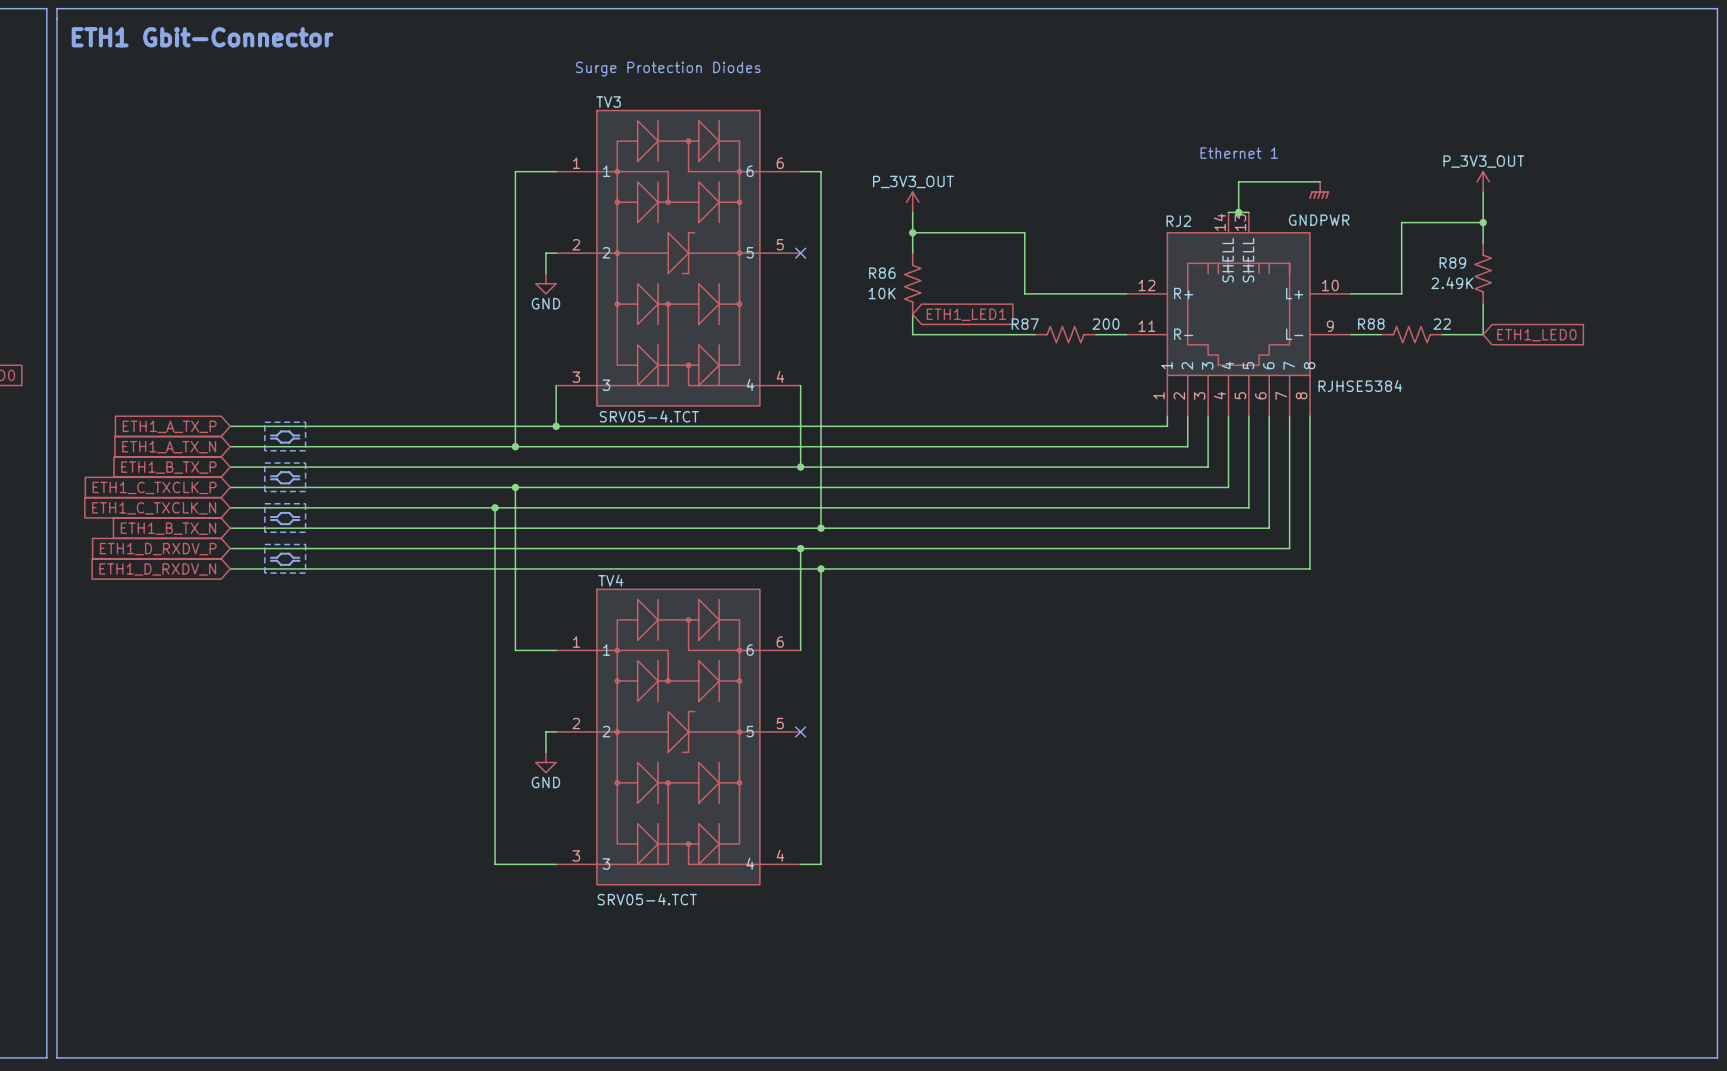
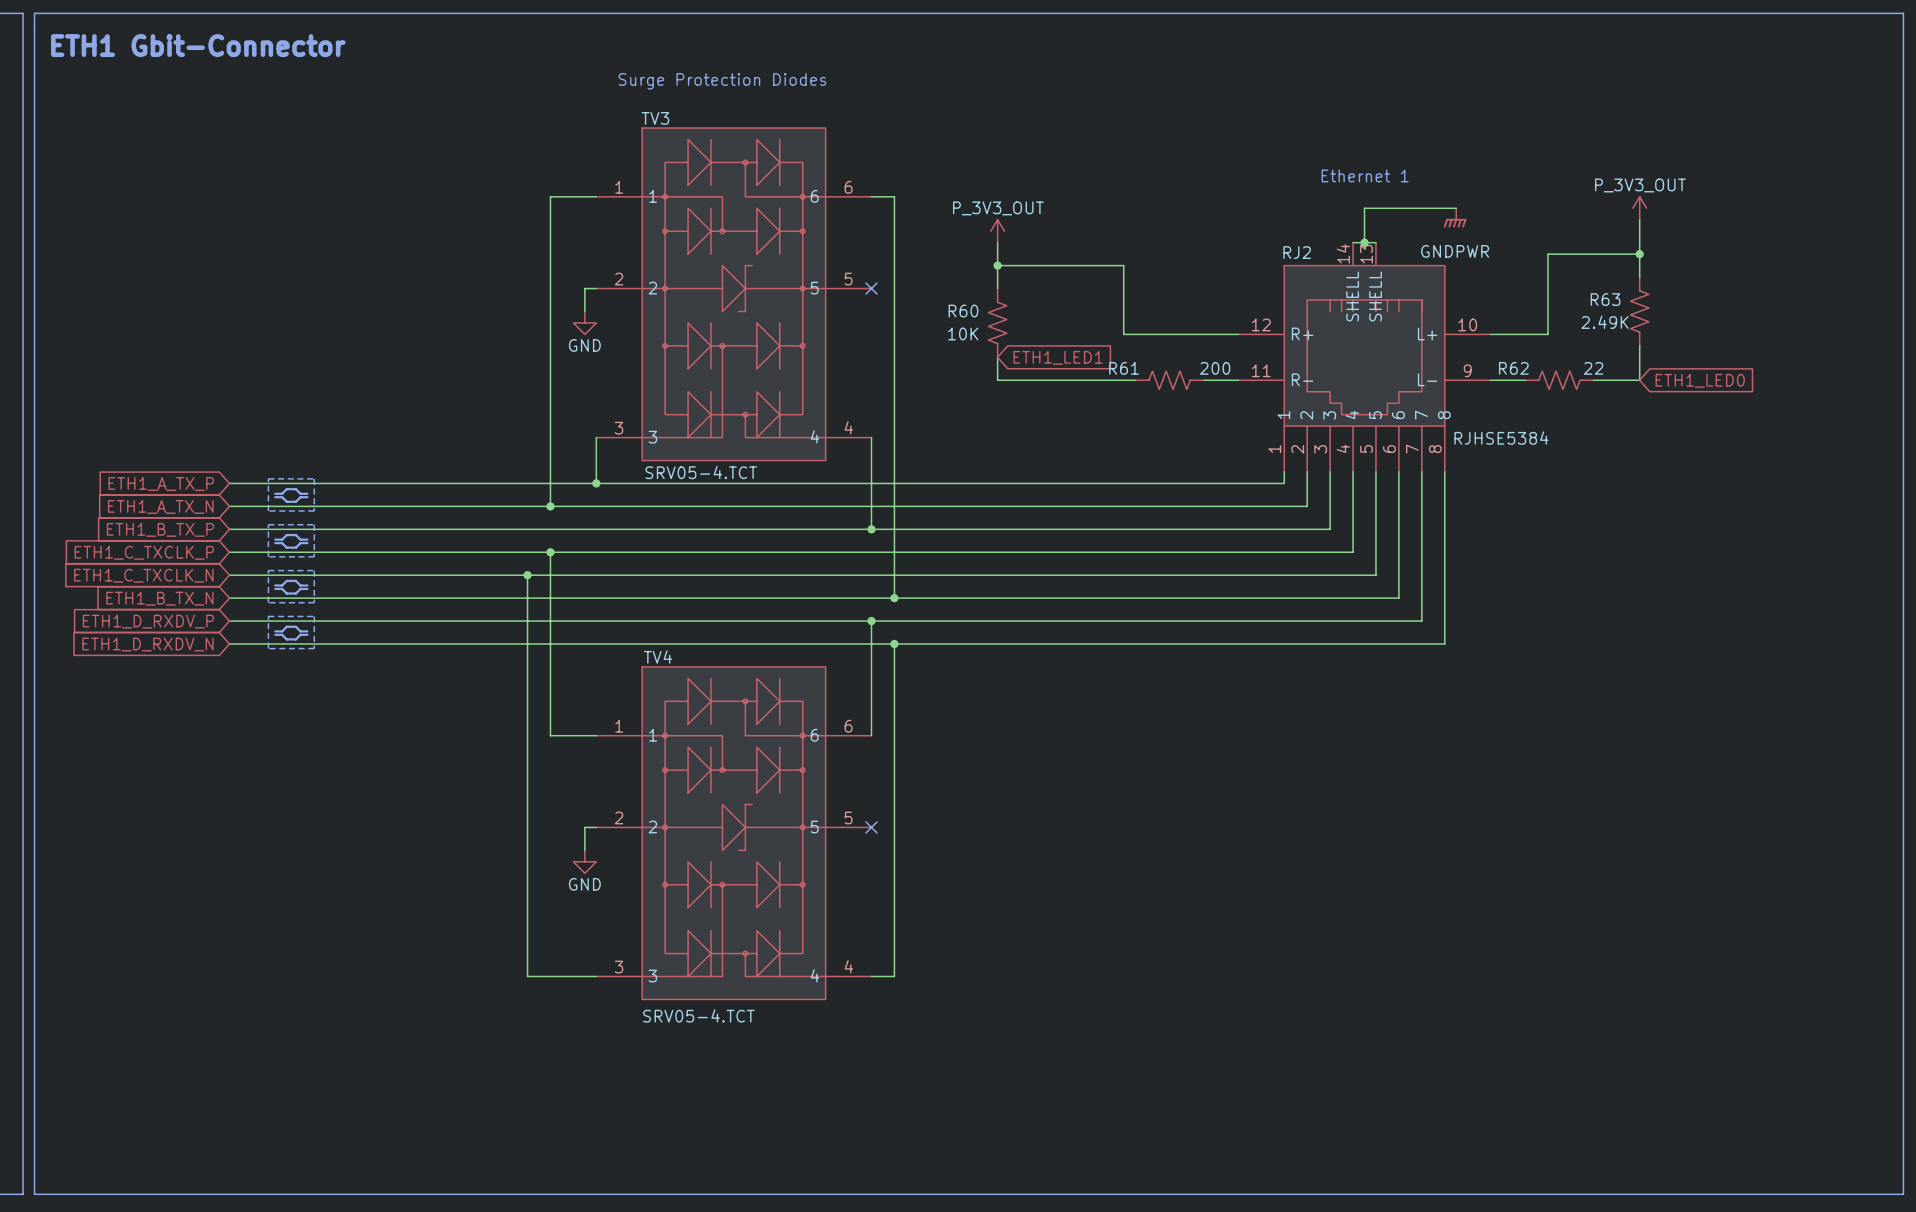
R89 name: R89 (1452, 262) -> R63 (1605, 299)
R86 name: R86 (882, 273) -> R60 (963, 311)
R87 name: R87 (1025, 324) -> R61 (1124, 368)
R88 name: R88 (1371, 324) -> R62 (1513, 368)

